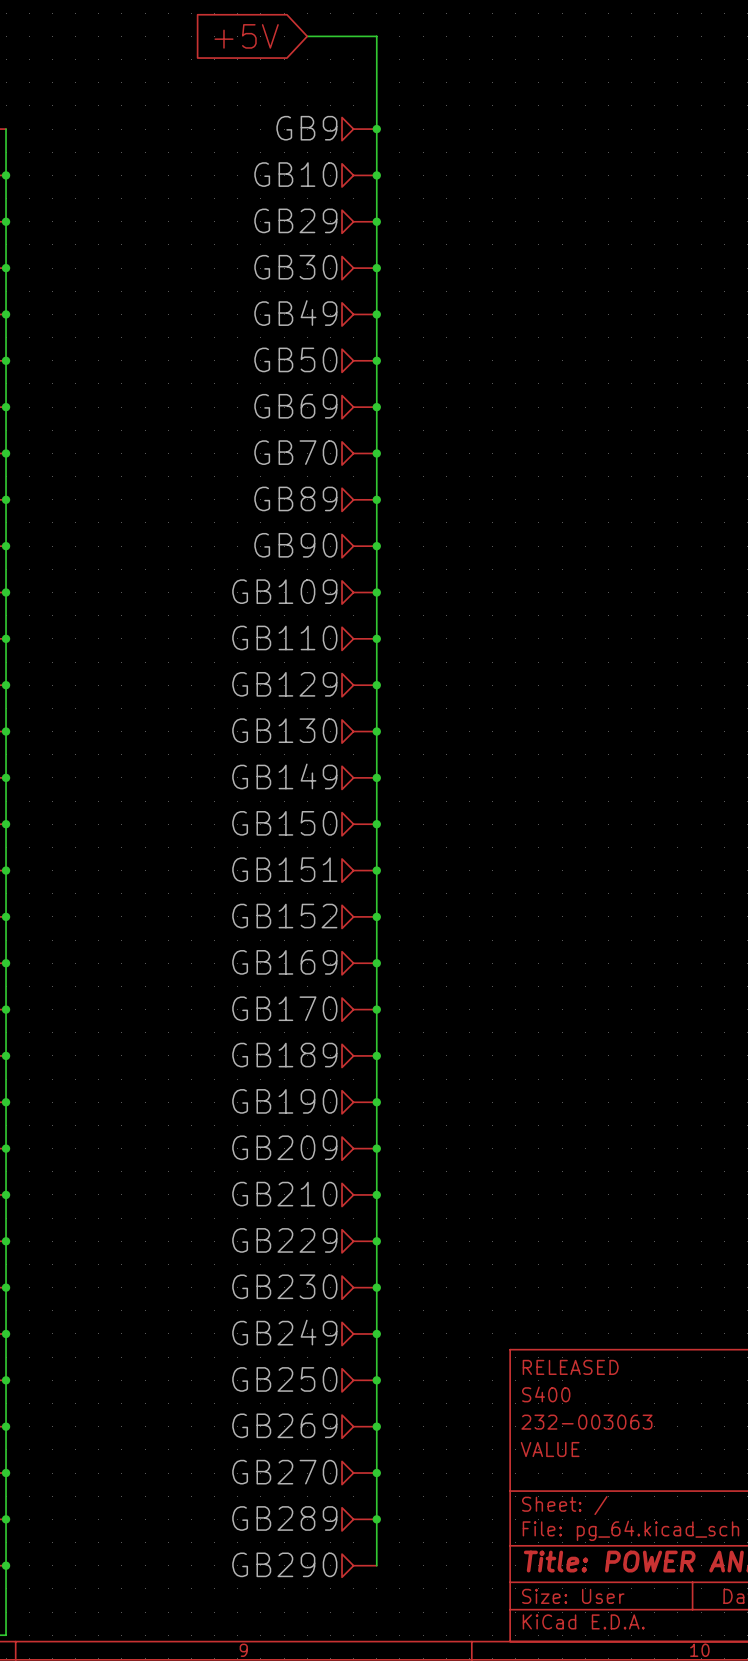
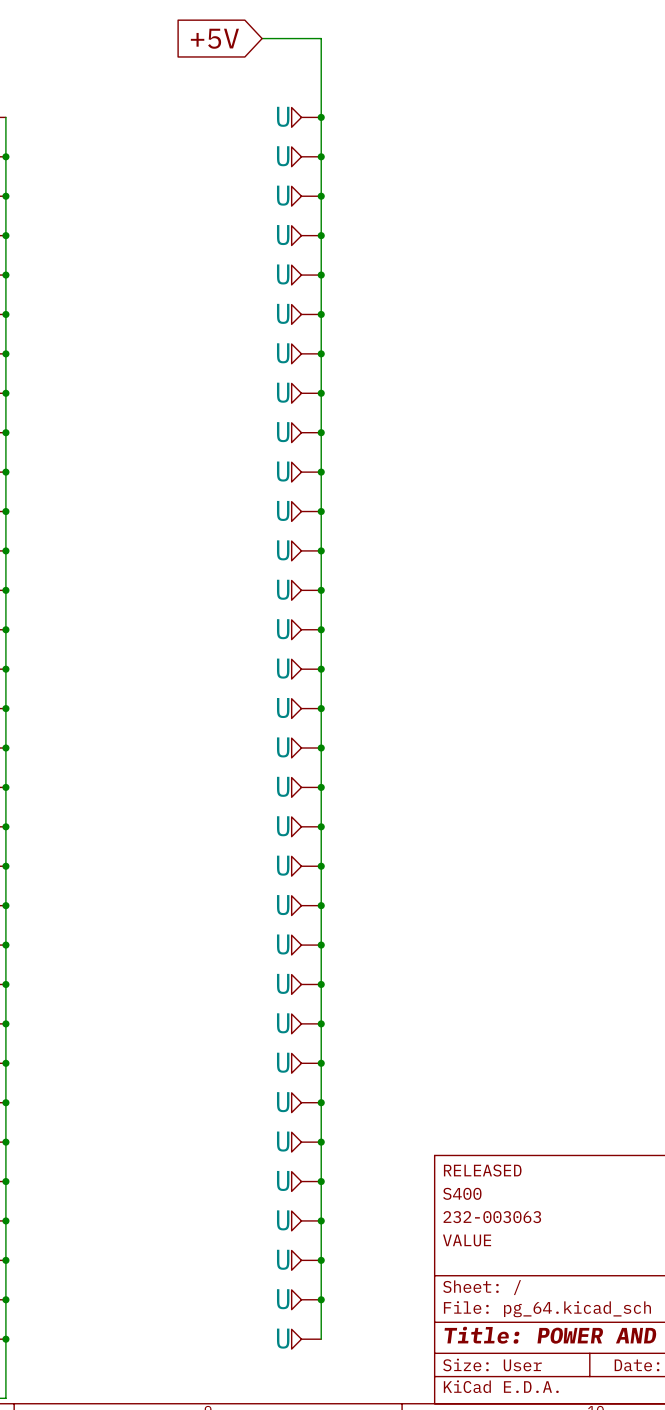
GB9 name: GB9 (306, 128) -> U (283, 116)
GB10 name: GB10 (295, 174) -> U (283, 156)
GB29 name: GB29 (295, 220) -> U (283, 195)
GB30 name: GB30 (295, 267) -> U (283, 235)
GB49 name: GB49 (295, 313) -> U (283, 274)
GB50 name: GB50 (295, 359) -> U (283, 313)
GB69 name: GB69 (295, 406) -> U (283, 353)
GB70 name: GB70 (295, 452) -> U (283, 392)
GB89 name: GB89 (295, 498) -> U (283, 432)
GB90 name: GB90 (295, 545) -> U (283, 471)
GB109 name: GB109 (284, 591) -> U (283, 510)
GB110 name: GB110 (284, 637) -> U (283, 550)
GB129 name: GB129 (284, 684) -> U (283, 589)
GB130 name: GB130 (284, 730) -> U (283, 629)
GB149 name: GB149 (284, 776) -> U (283, 668)
GB150 name: GB150 (284, 823) -> U (283, 708)
GB151 name: GB151 (284, 869) -> U (283, 747)
GB152 name: GB152 (284, 916) -> U (283, 786)
GB169 name: GB169 (284, 962) -> U (283, 826)
GB170 name: GB170 (284, 1008) -> U (283, 865)
GB189 name: GB189 (284, 1055) -> U (283, 905)
GB190 name: GB190 (284, 1101) -> U (283, 944)
GB209 name: GB209 (284, 1147) -> U (283, 983)
GB210 name: GB210 (284, 1194) -> U (283, 1023)
GB229 name: GB229 (284, 1240) -> U (283, 1062)
GB230 name: GB230 (284, 1286) -> U (283, 1102)
GB249 name: GB249 (284, 1332) -> U (283, 1141)
GB250 name: GB250 (284, 1379) -> U (283, 1180)
GB269 name: GB269 (284, 1425) -> U (283, 1220)
GB270 name: GB270 (284, 1472) -> U (283, 1259)
GB289 name: GB289 (284, 1518) -> U (283, 1299)
GB290 name: GB290 (284, 1564) -> U (283, 1338)

